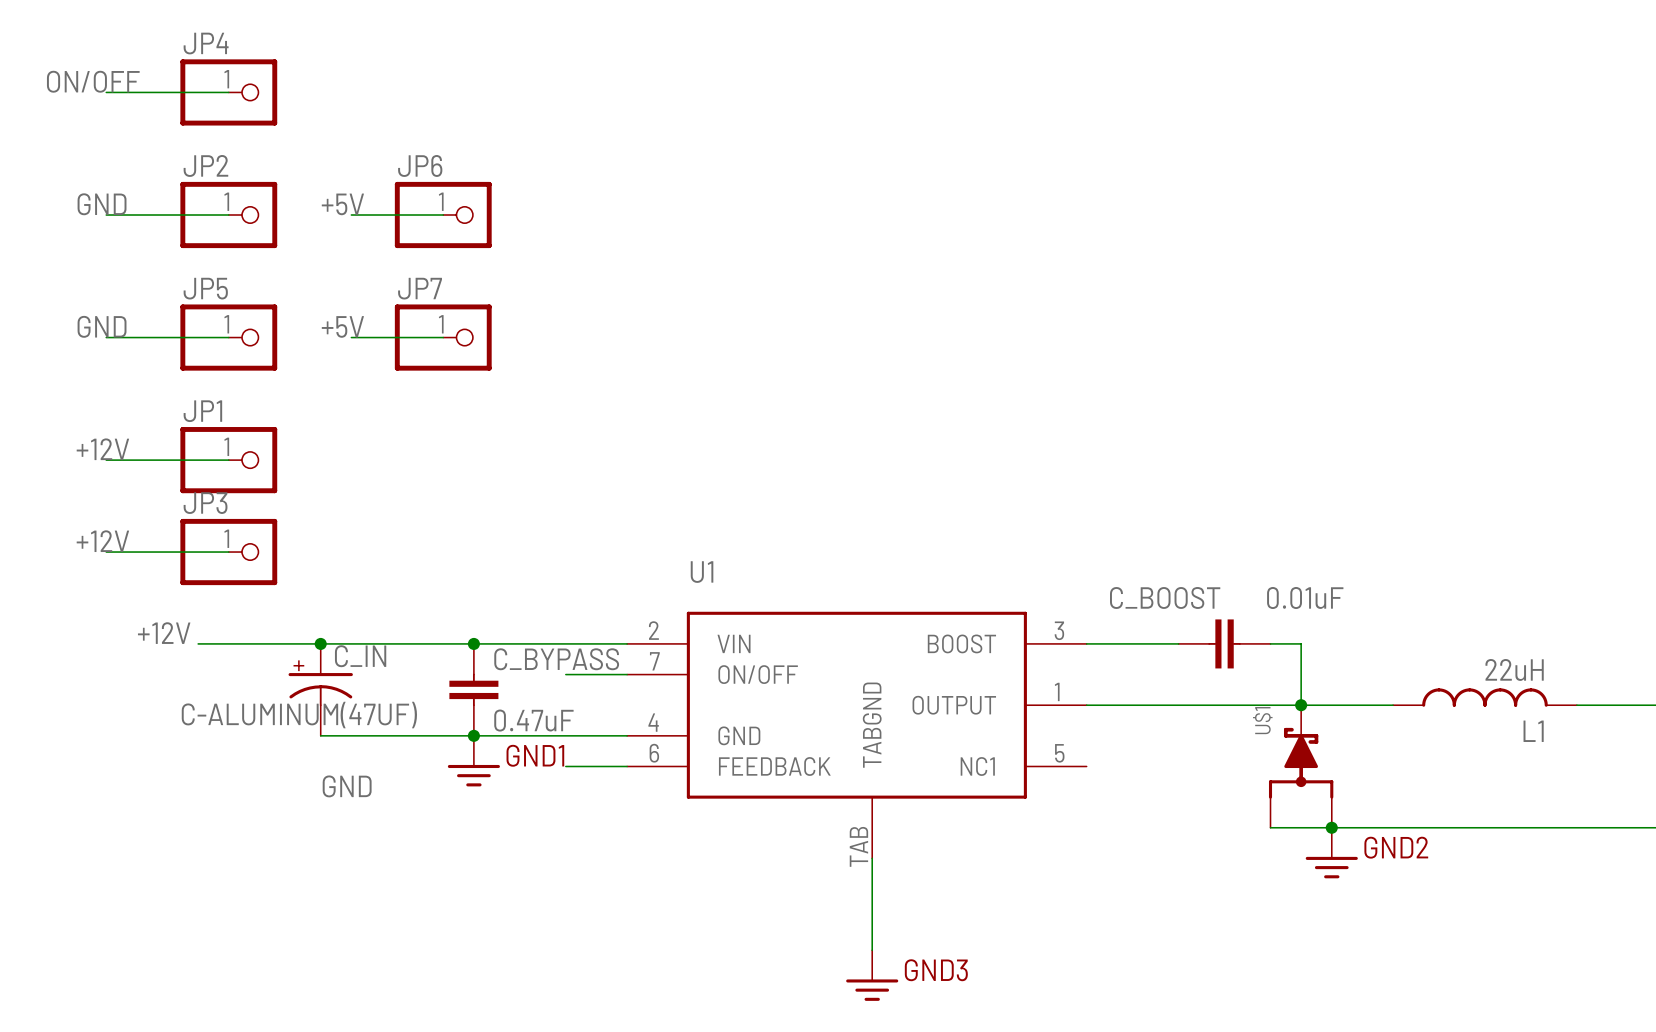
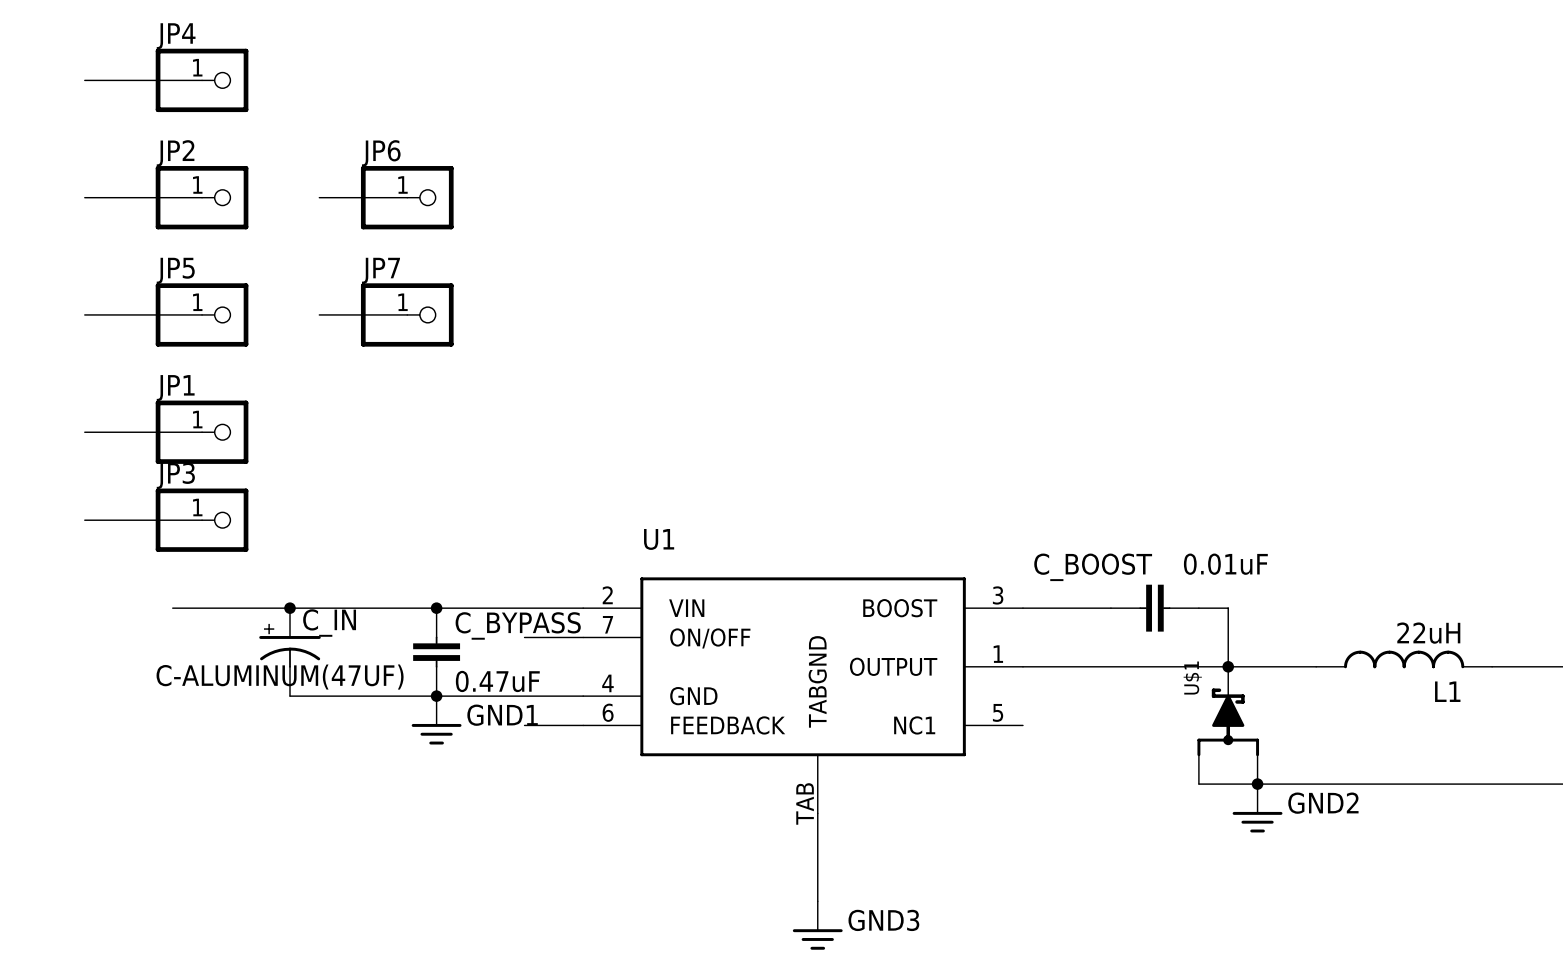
label: ON/OFF (93, 81) -> none
label: GND (102, 204) -> none
label: +5V (342, 204) -> none
label: GND (102, 326) -> none
label: +5V (342, 326) -> none
label: +12V (102, 449) -> none
label: +12V (102, 541) -> none
label: +12V (164, 633) -> none
label: GND (347, 786) -> none

